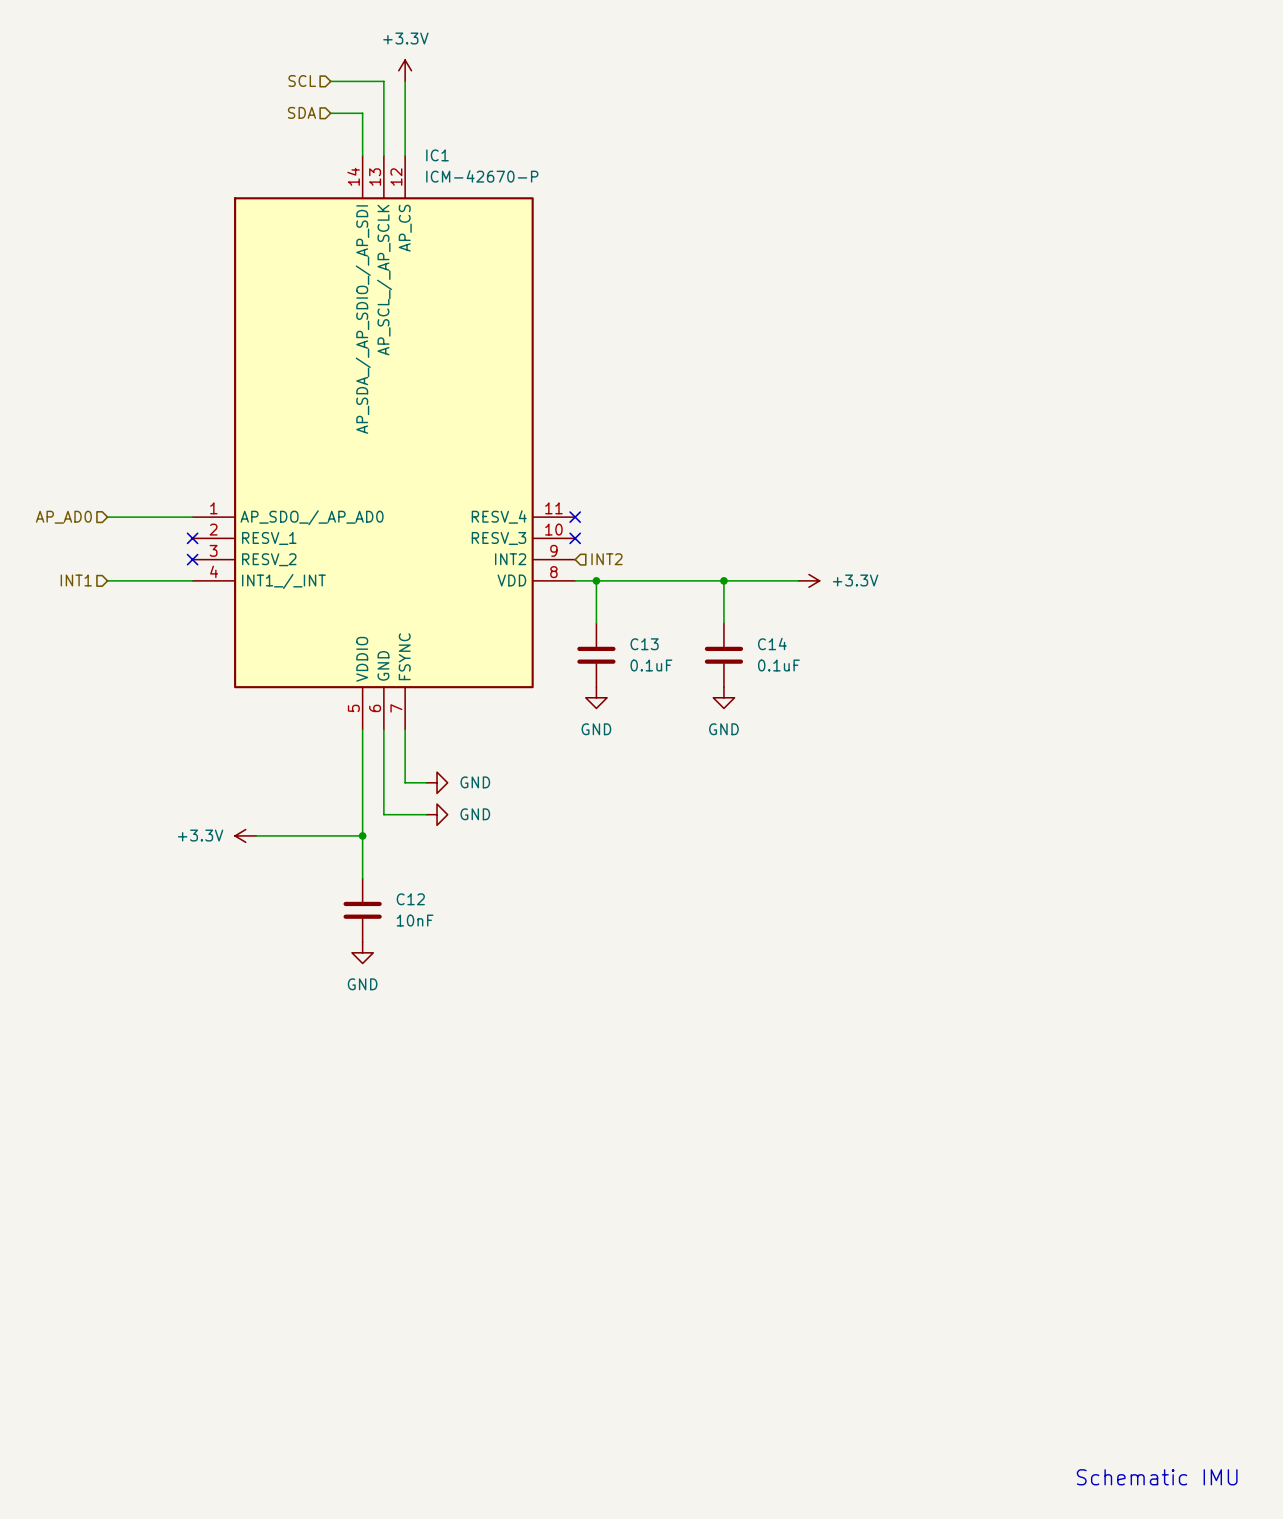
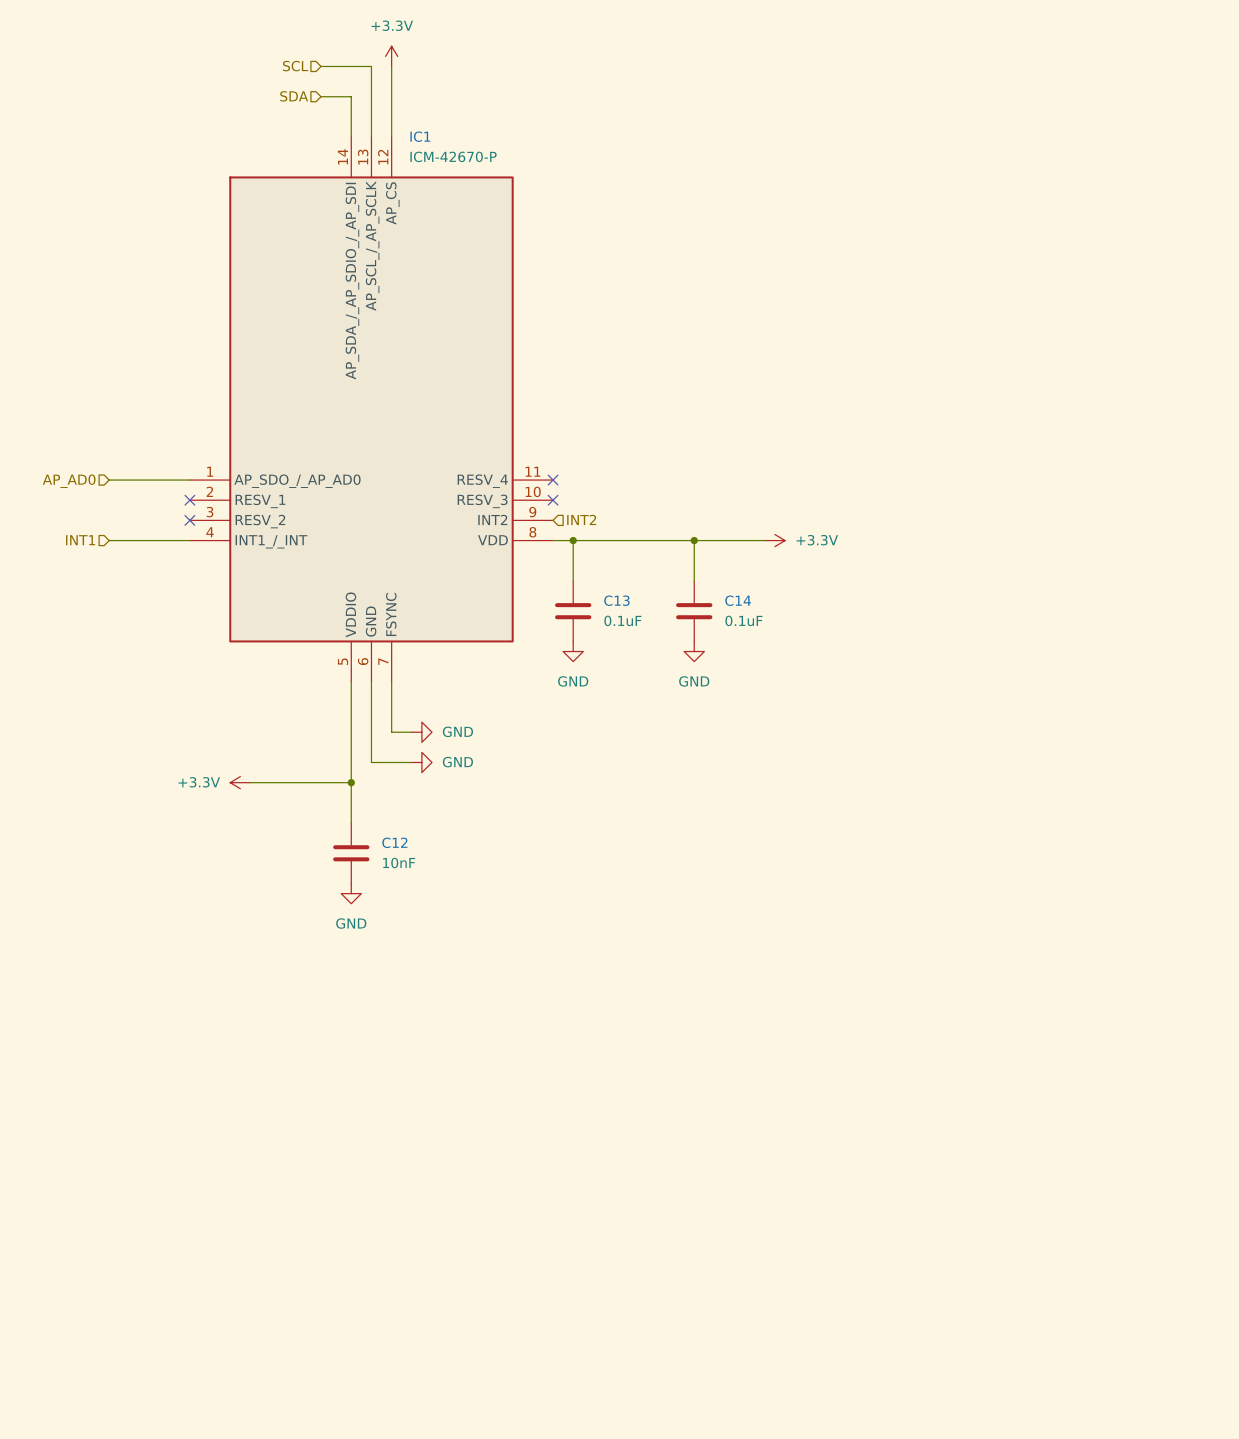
text: Schematic IMU (1157, 1477) -> none

